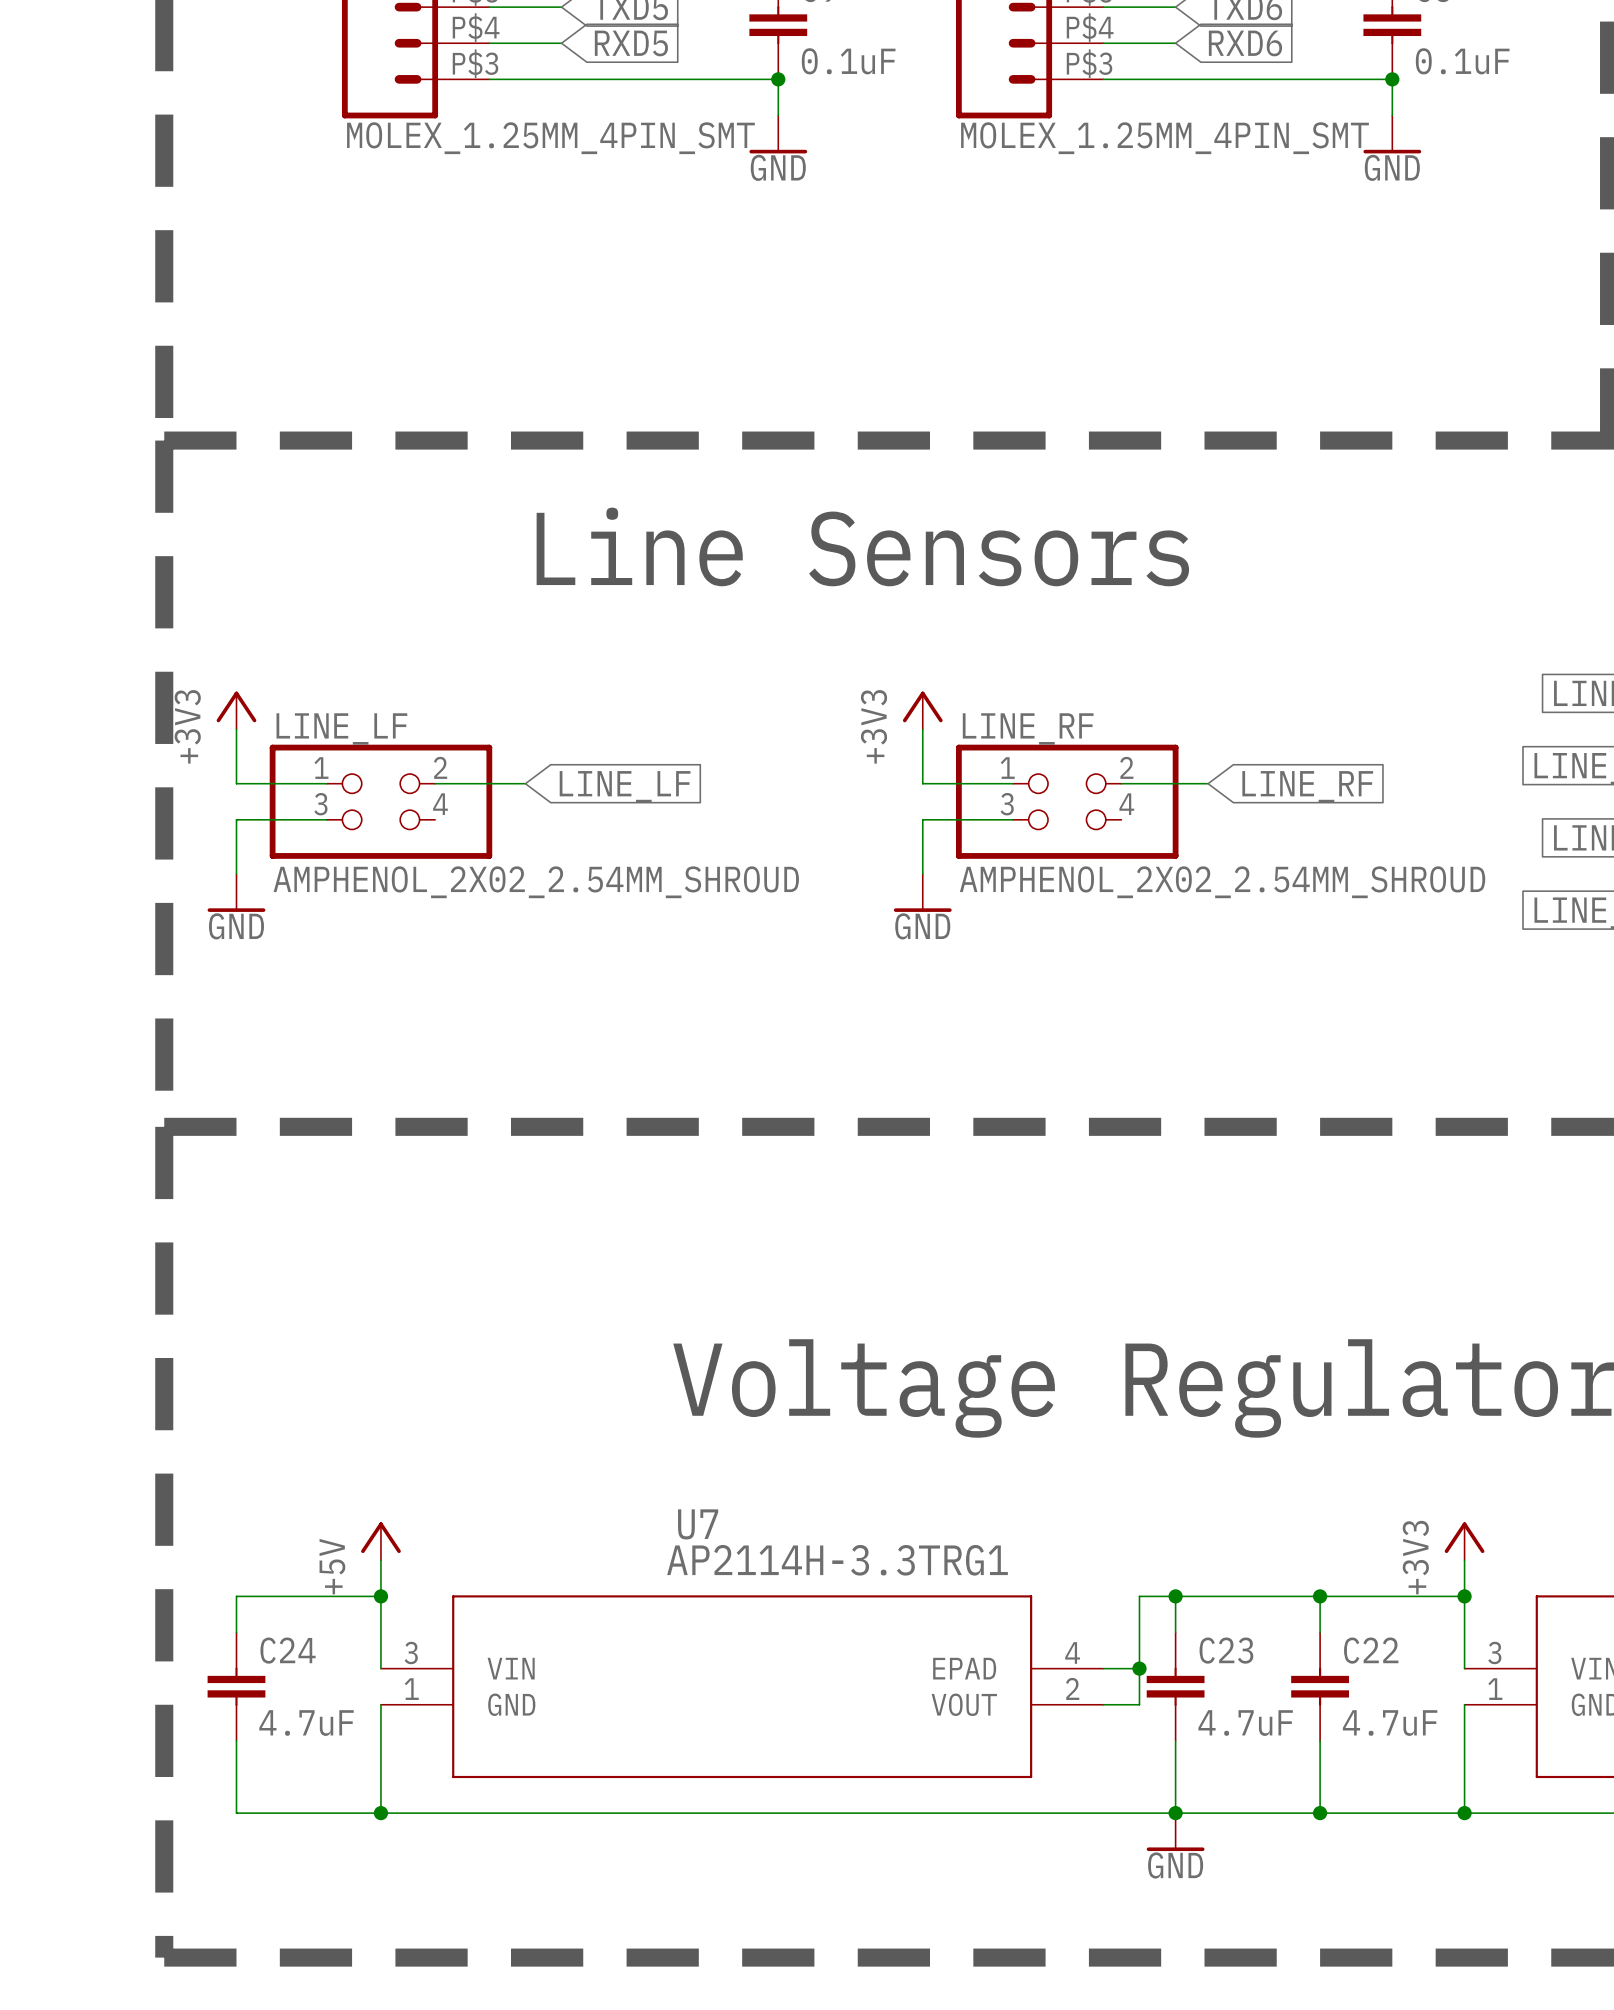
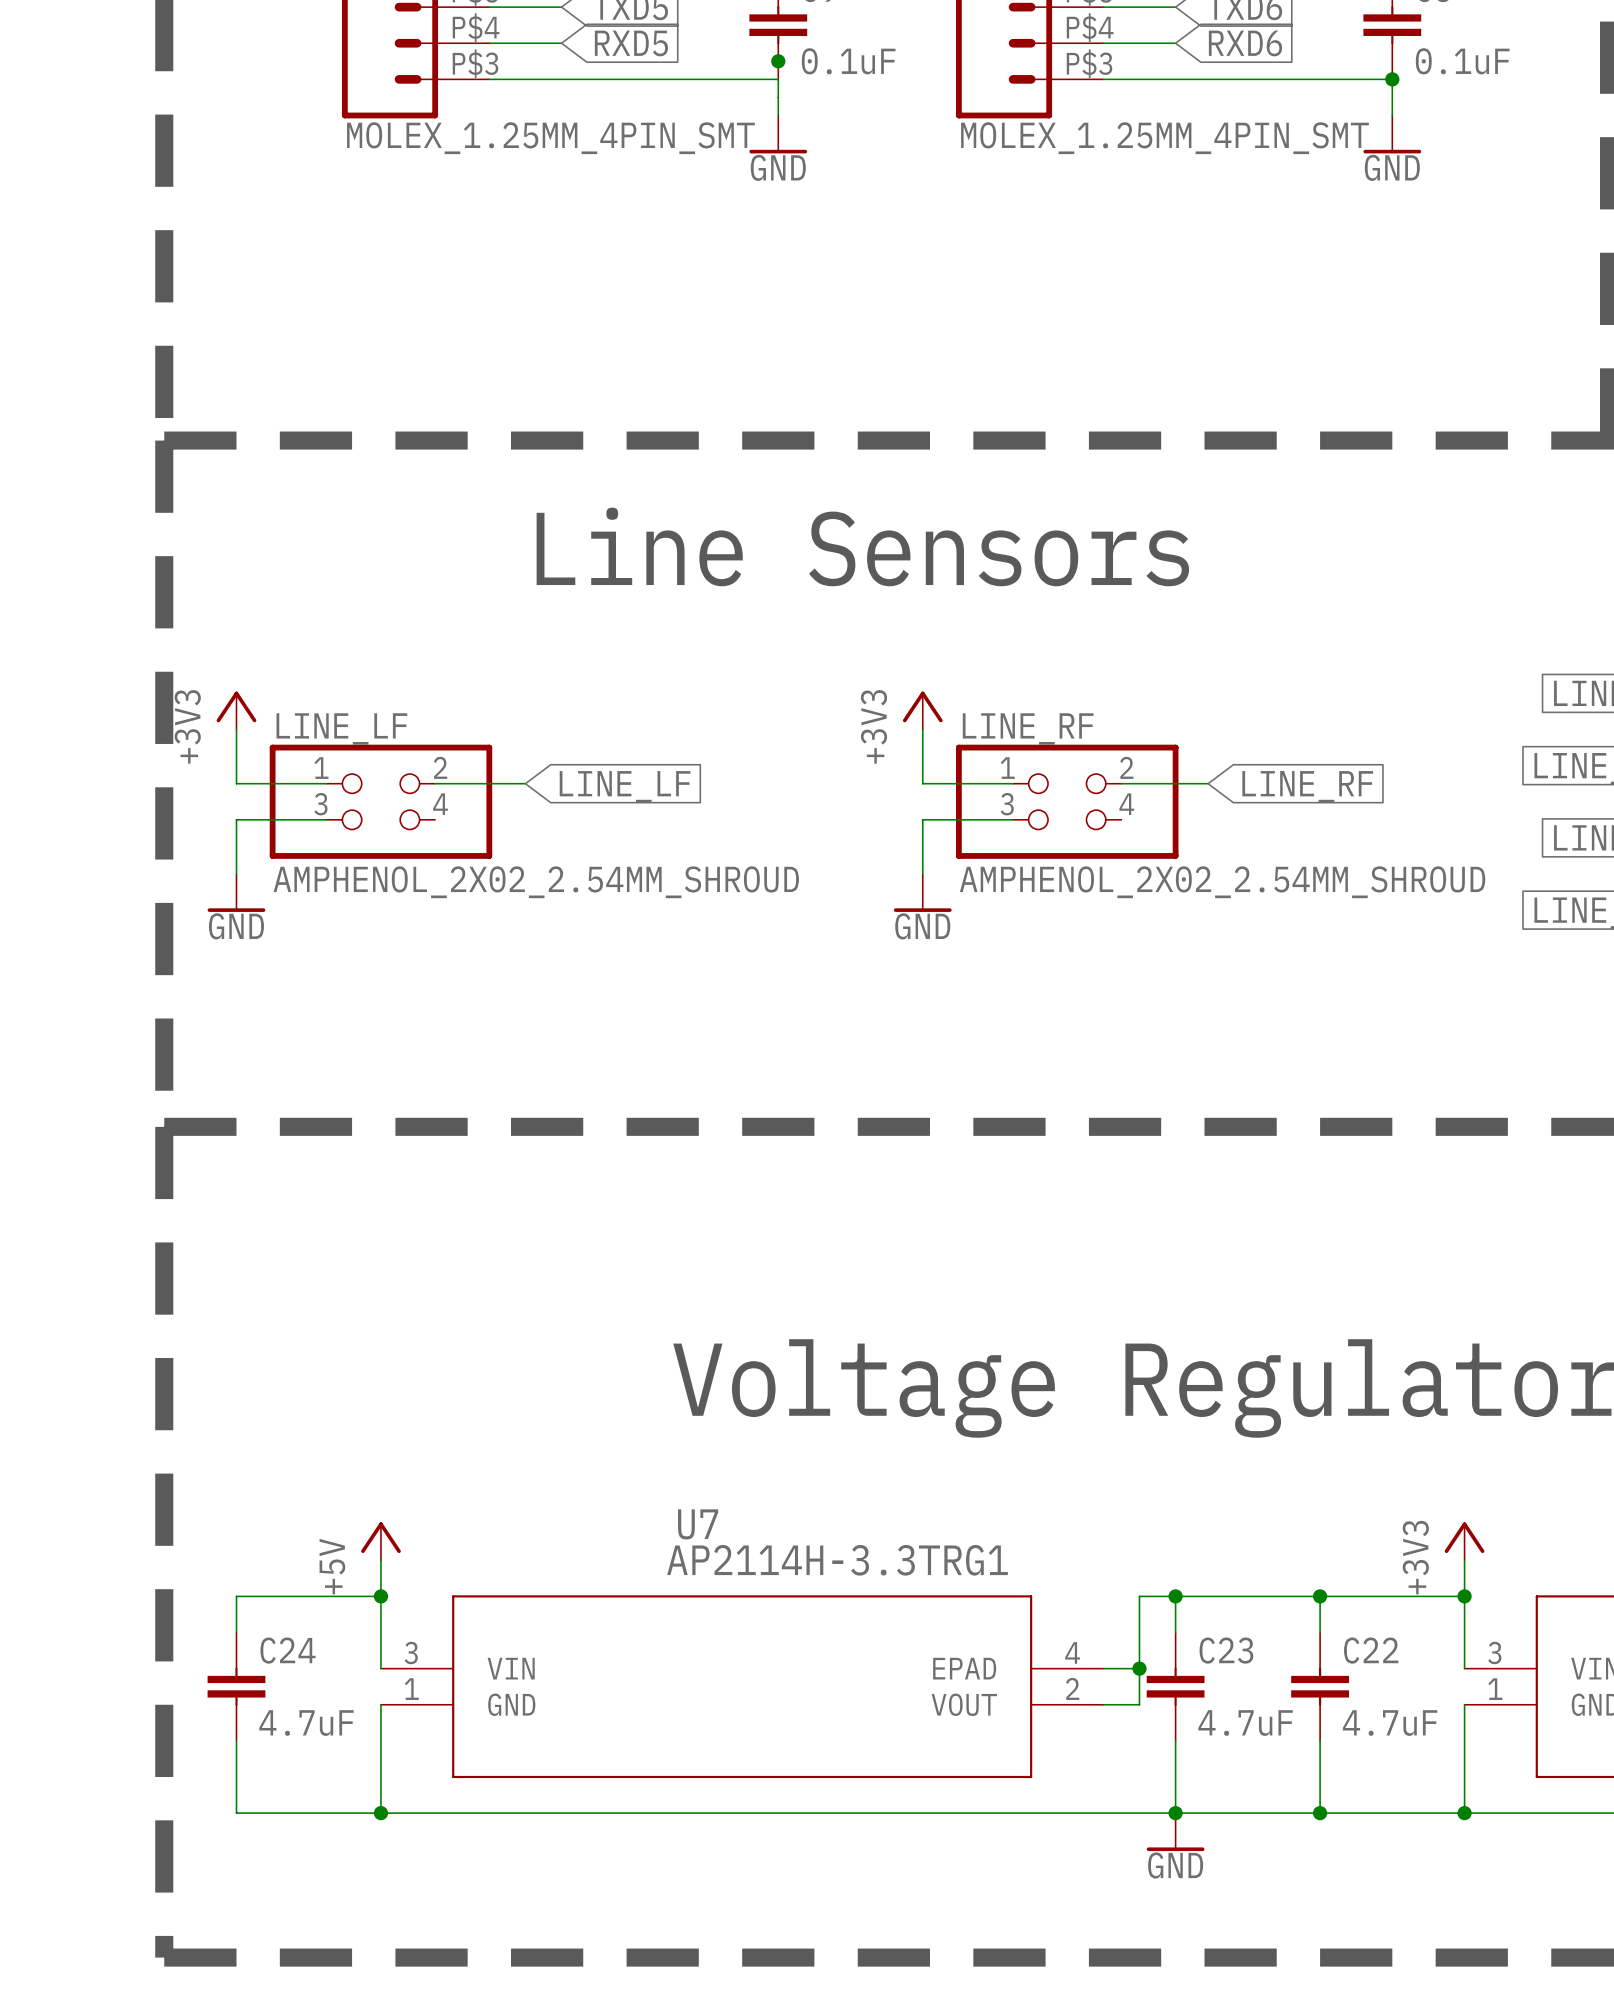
junction position: (778, 79) -> (778, 61)

